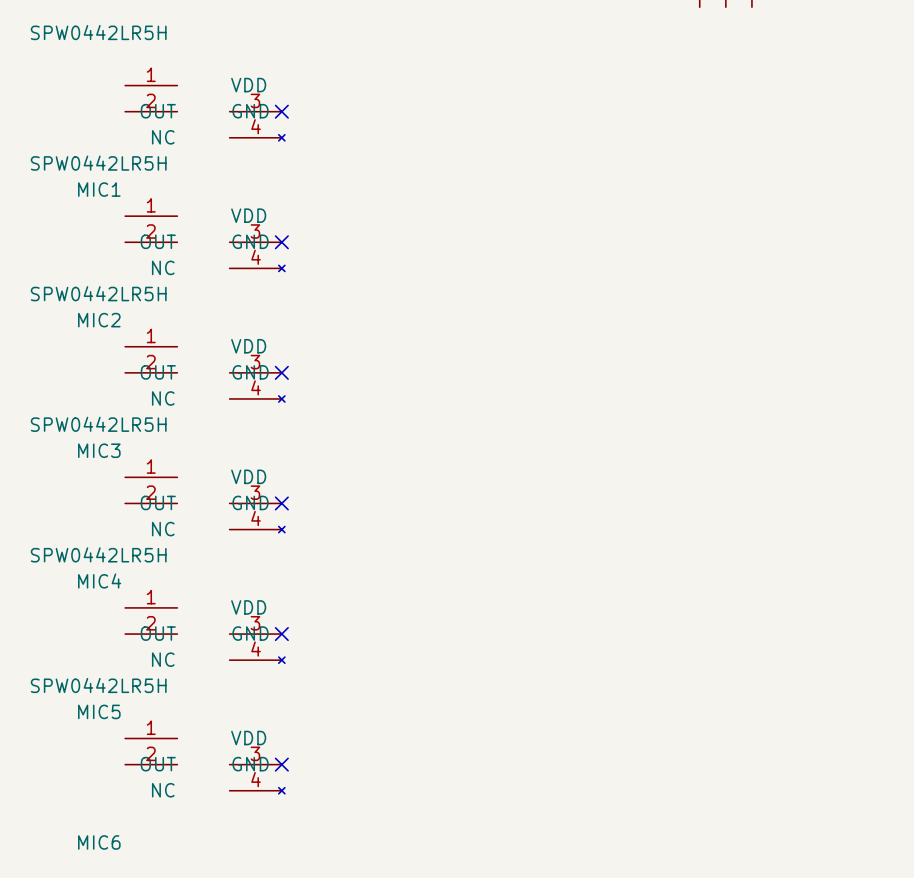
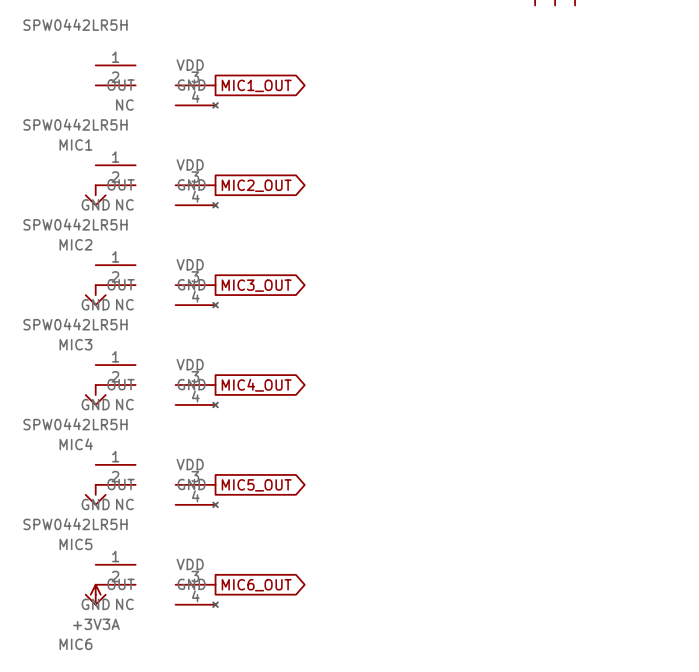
no-connect mark: (281, 111) -> none
global label: none -> MIC1_OUT (256, 85)
no-connect mark: (281, 242) -> none
global label: none -> MIC2_OUT (256, 185)
power symbol: none -> GND (95, 195)
no-connect mark: (281, 372) -> none
global label: none -> MIC3_OUT (256, 285)
power symbol: none -> GND (95, 295)
no-connect mark: (281, 503) -> none
global label: none -> MIC4_OUT (256, 385)
power symbol: none -> GND (95, 395)
no-connect mark: (281, 634) -> none
global label: none -> MIC5_OUT (256, 485)
power symbol: none -> GND (95, 494)
no-connect mark: (281, 764) -> none
global label: none -> MIC6_OUT (256, 585)
power symbol: none -> +3V3A (95, 594)
power symbol: none -> GND (95, 594)

